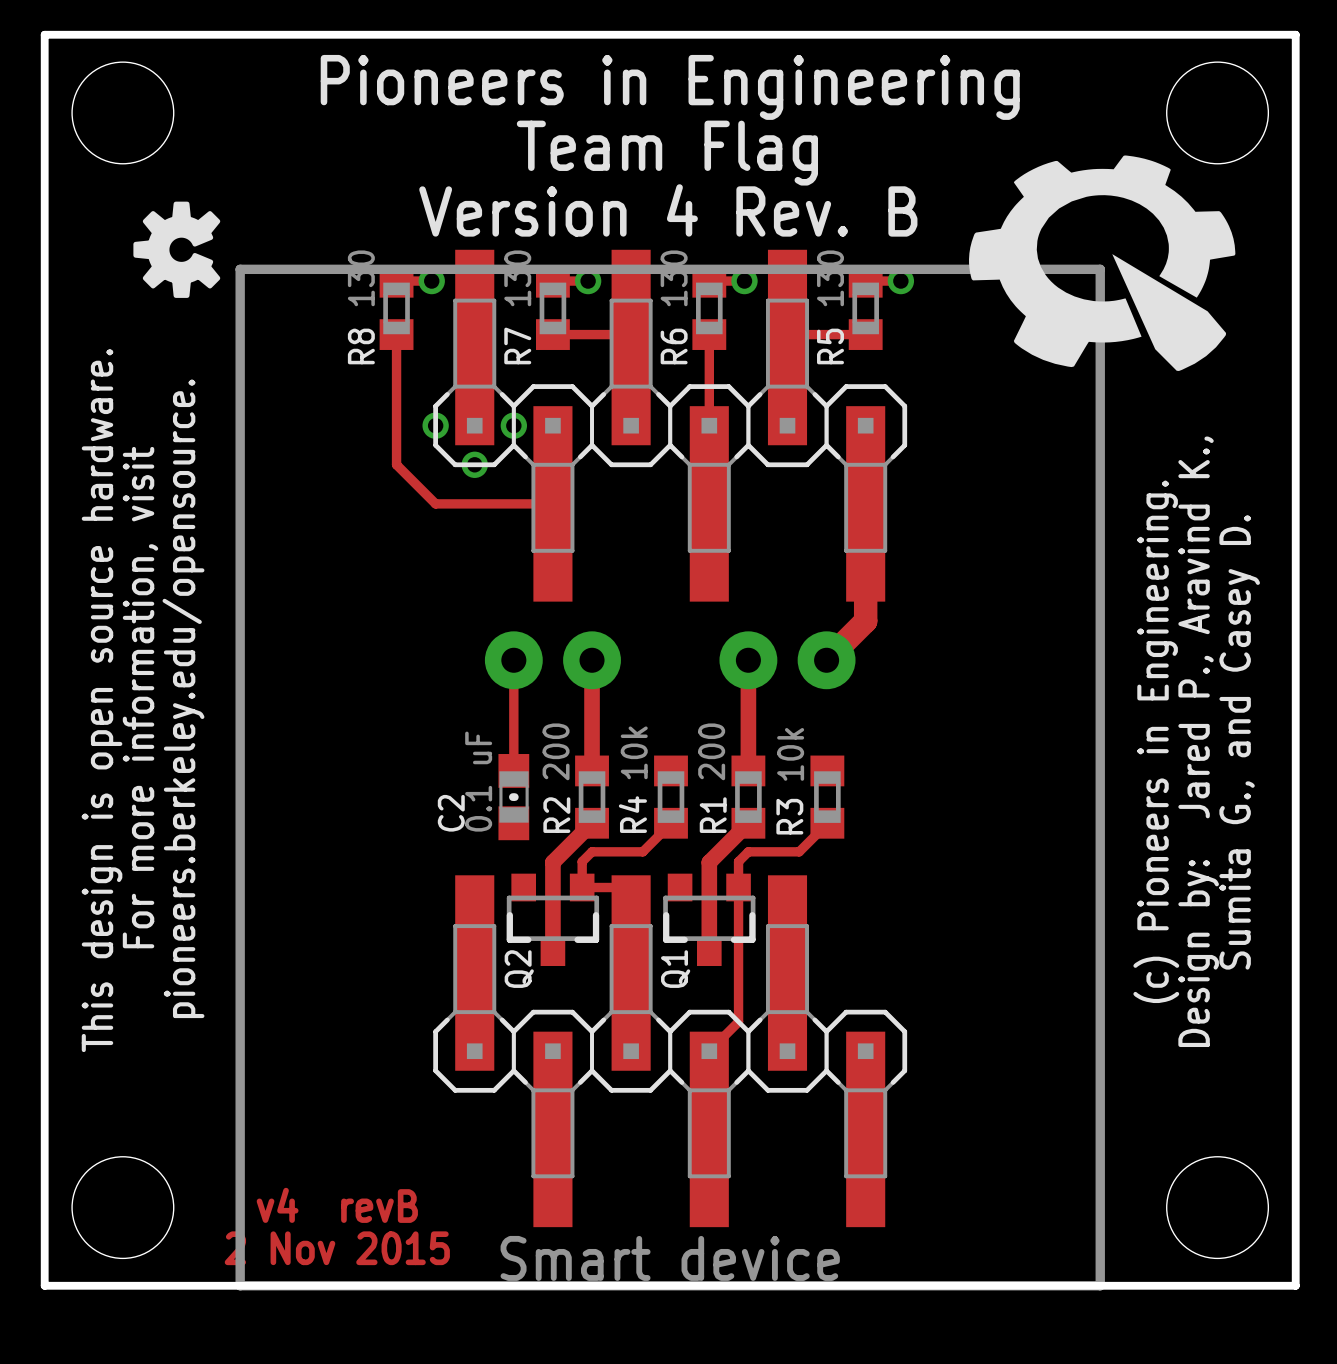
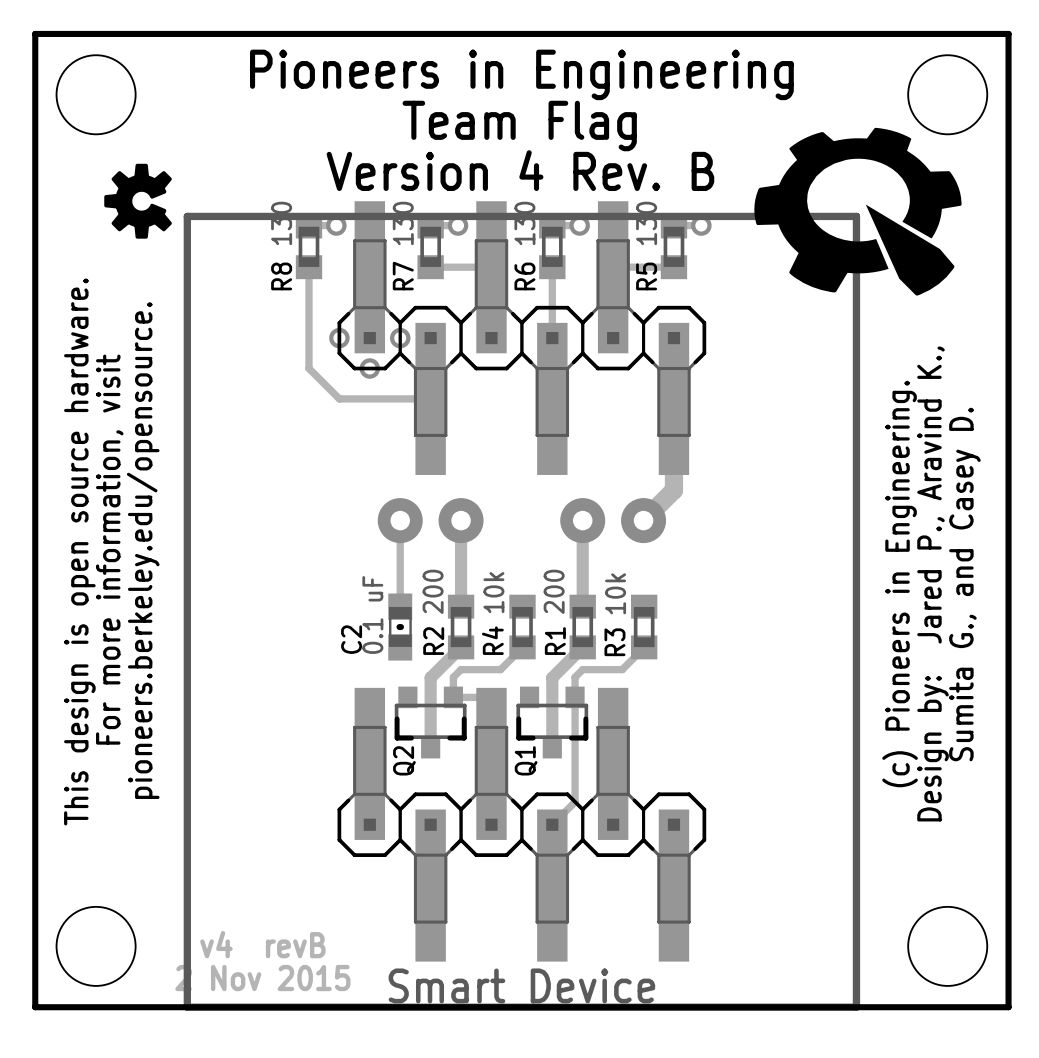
text: Smart device (670, 1258) -> Smart Device (521, 985)

